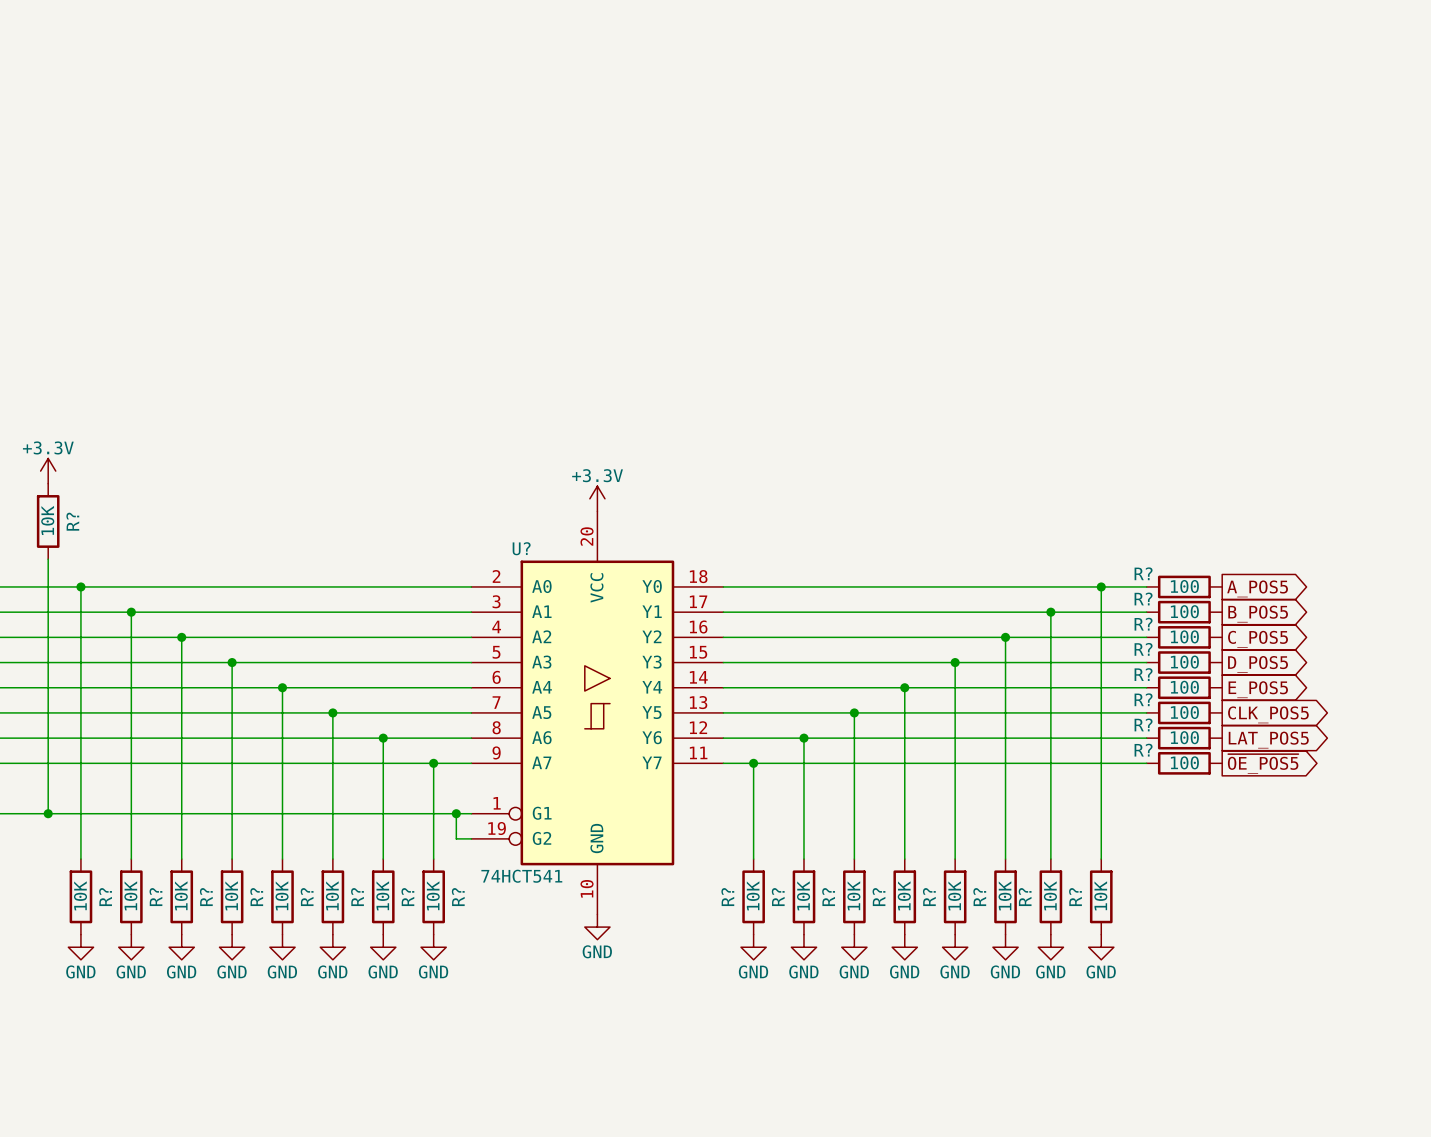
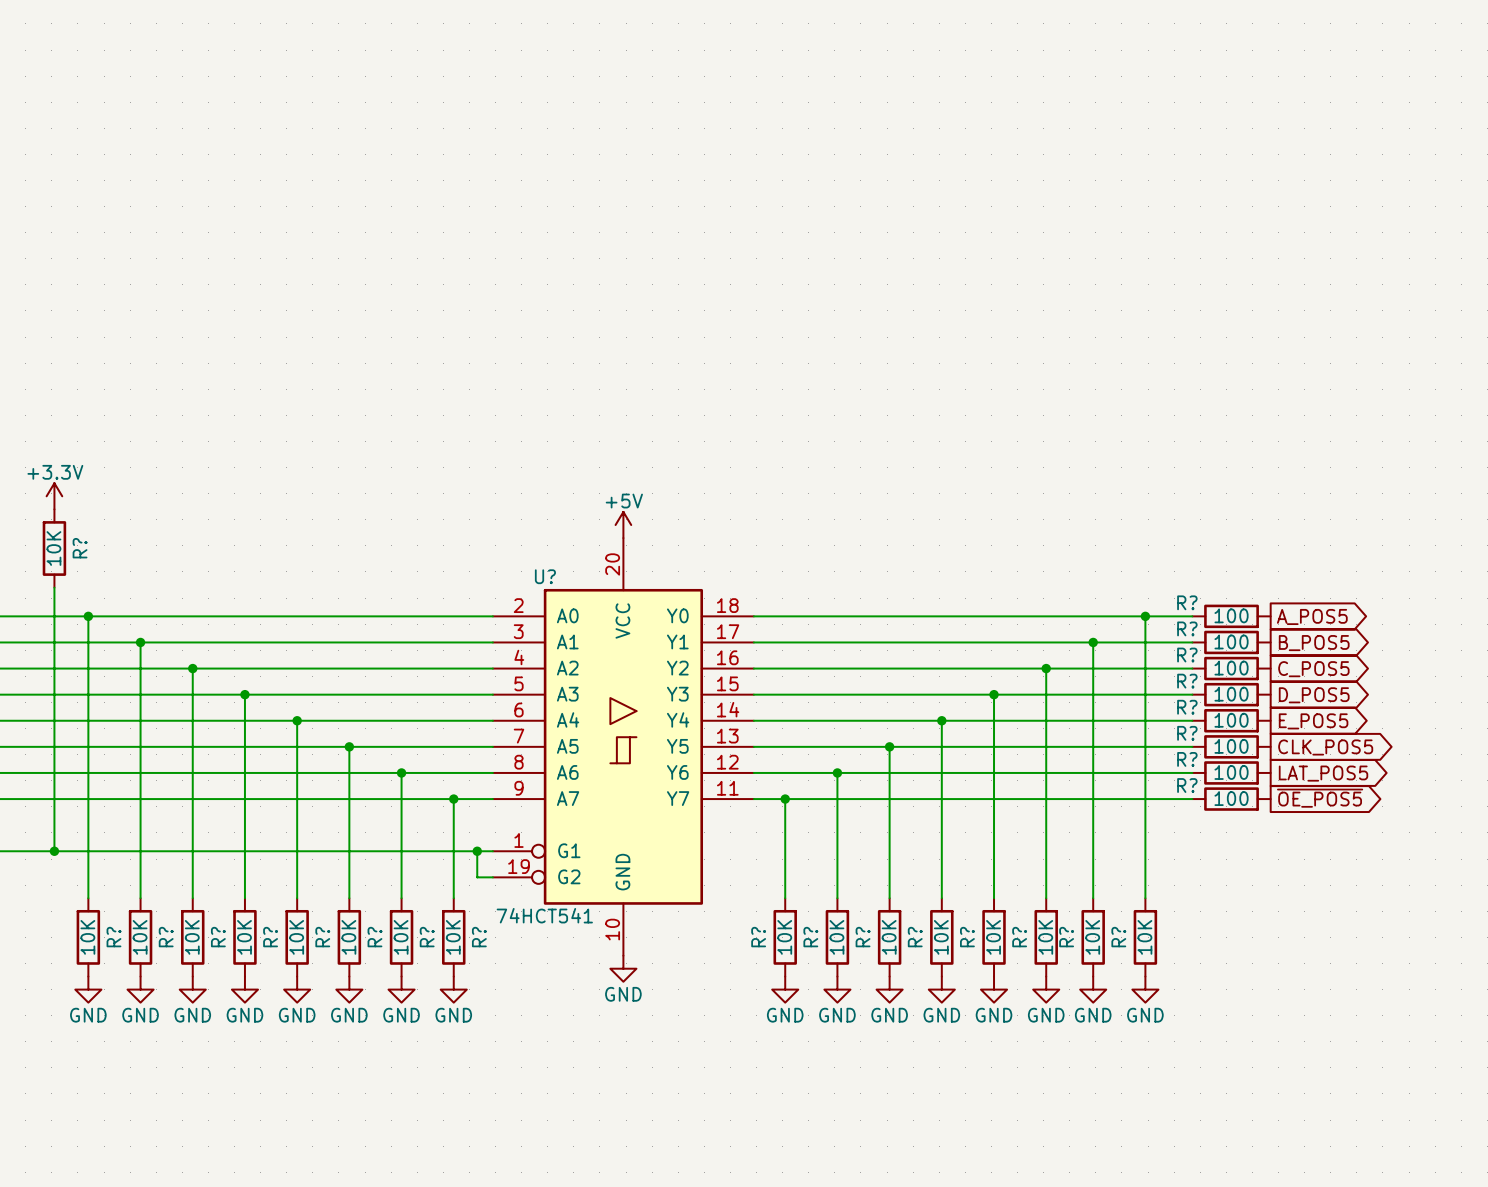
power symbol: +3.3V (597, 498) -> +5V (623, 525)

